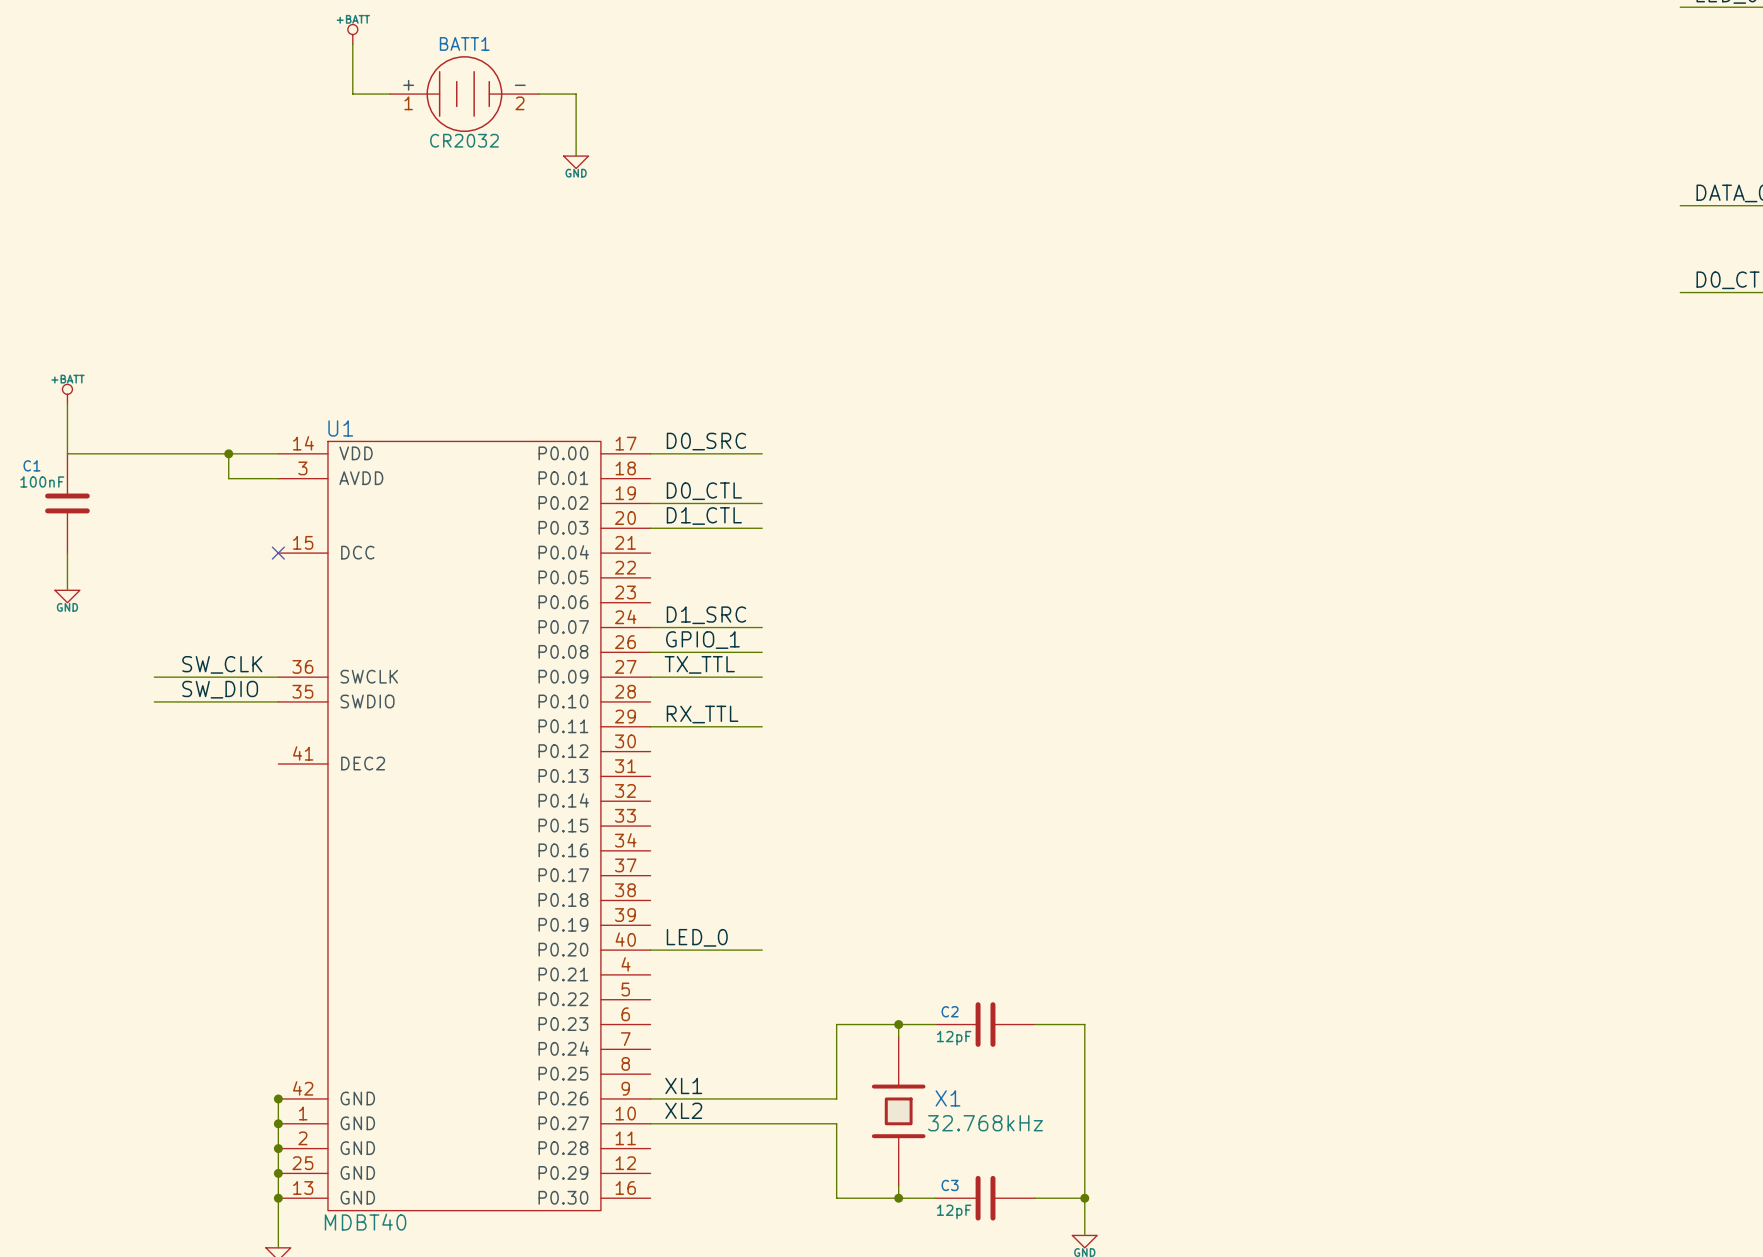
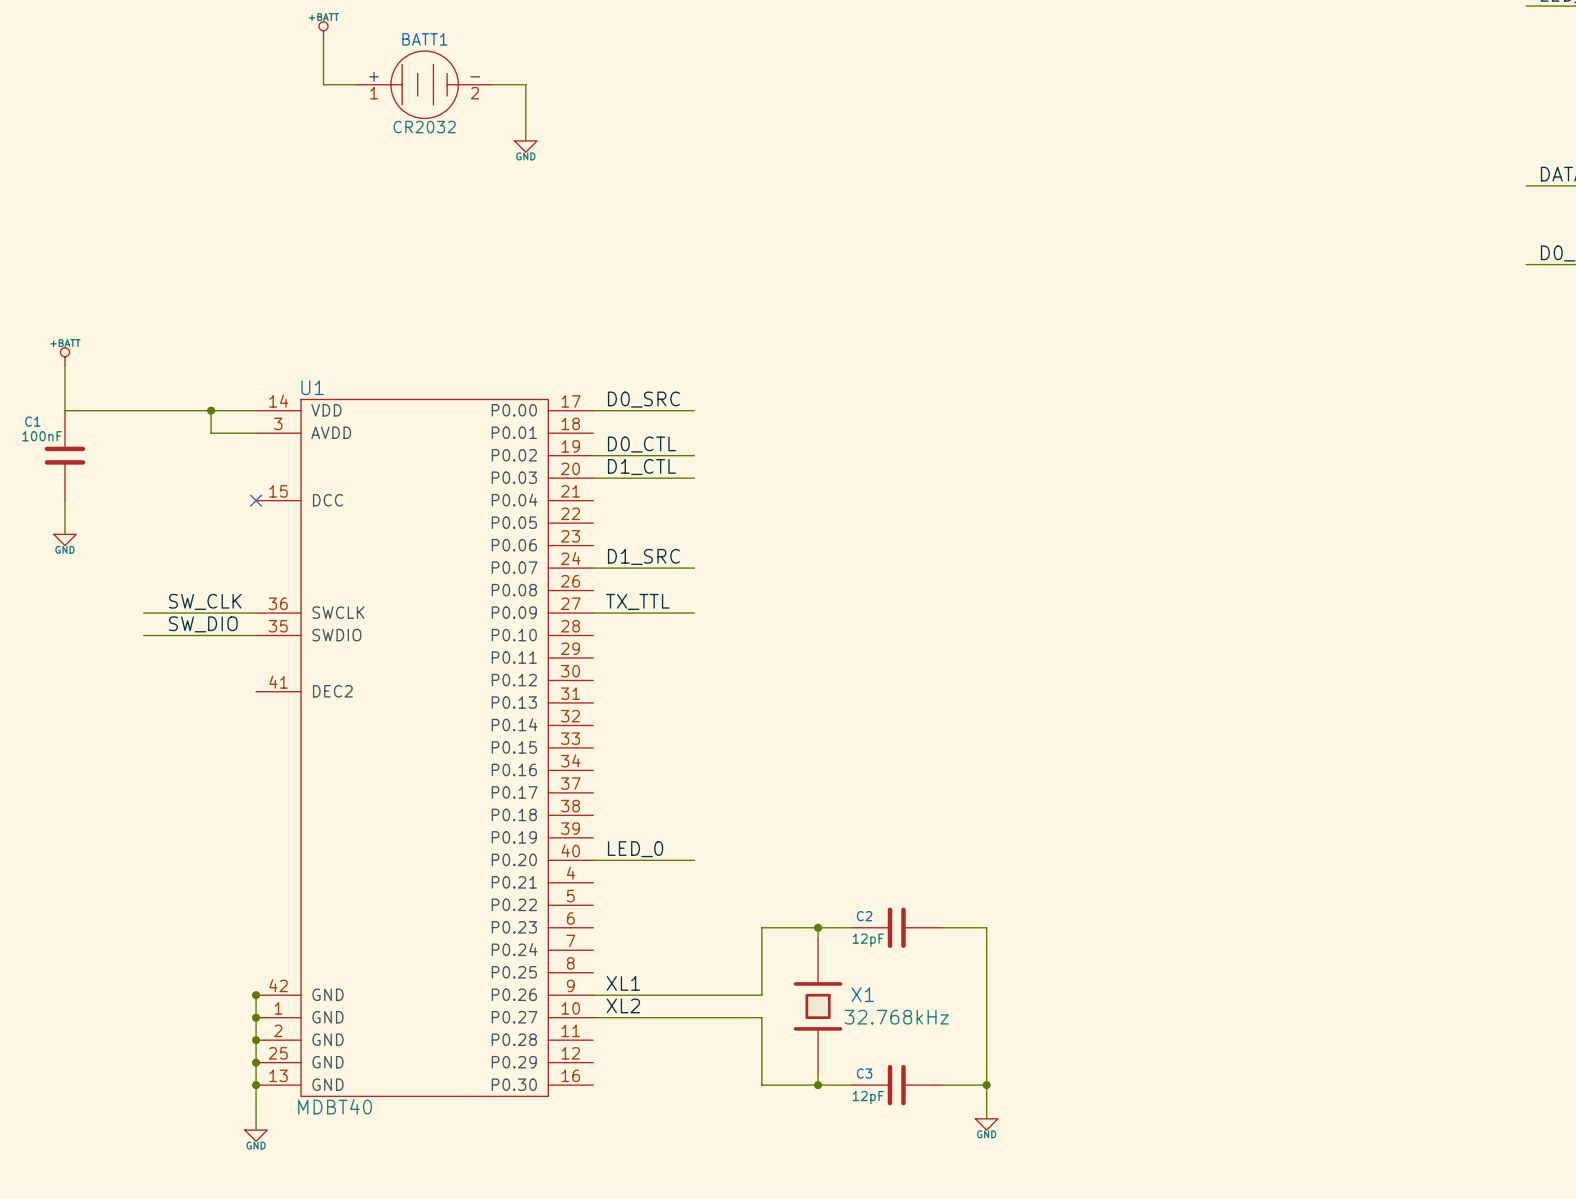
label: GPIO_1 (702, 640) -> none
wire: (650, 652) (762, 652) -> none
label: RX_TTL (702, 714) -> none
wire: (650, 726) (762, 726) -> none

